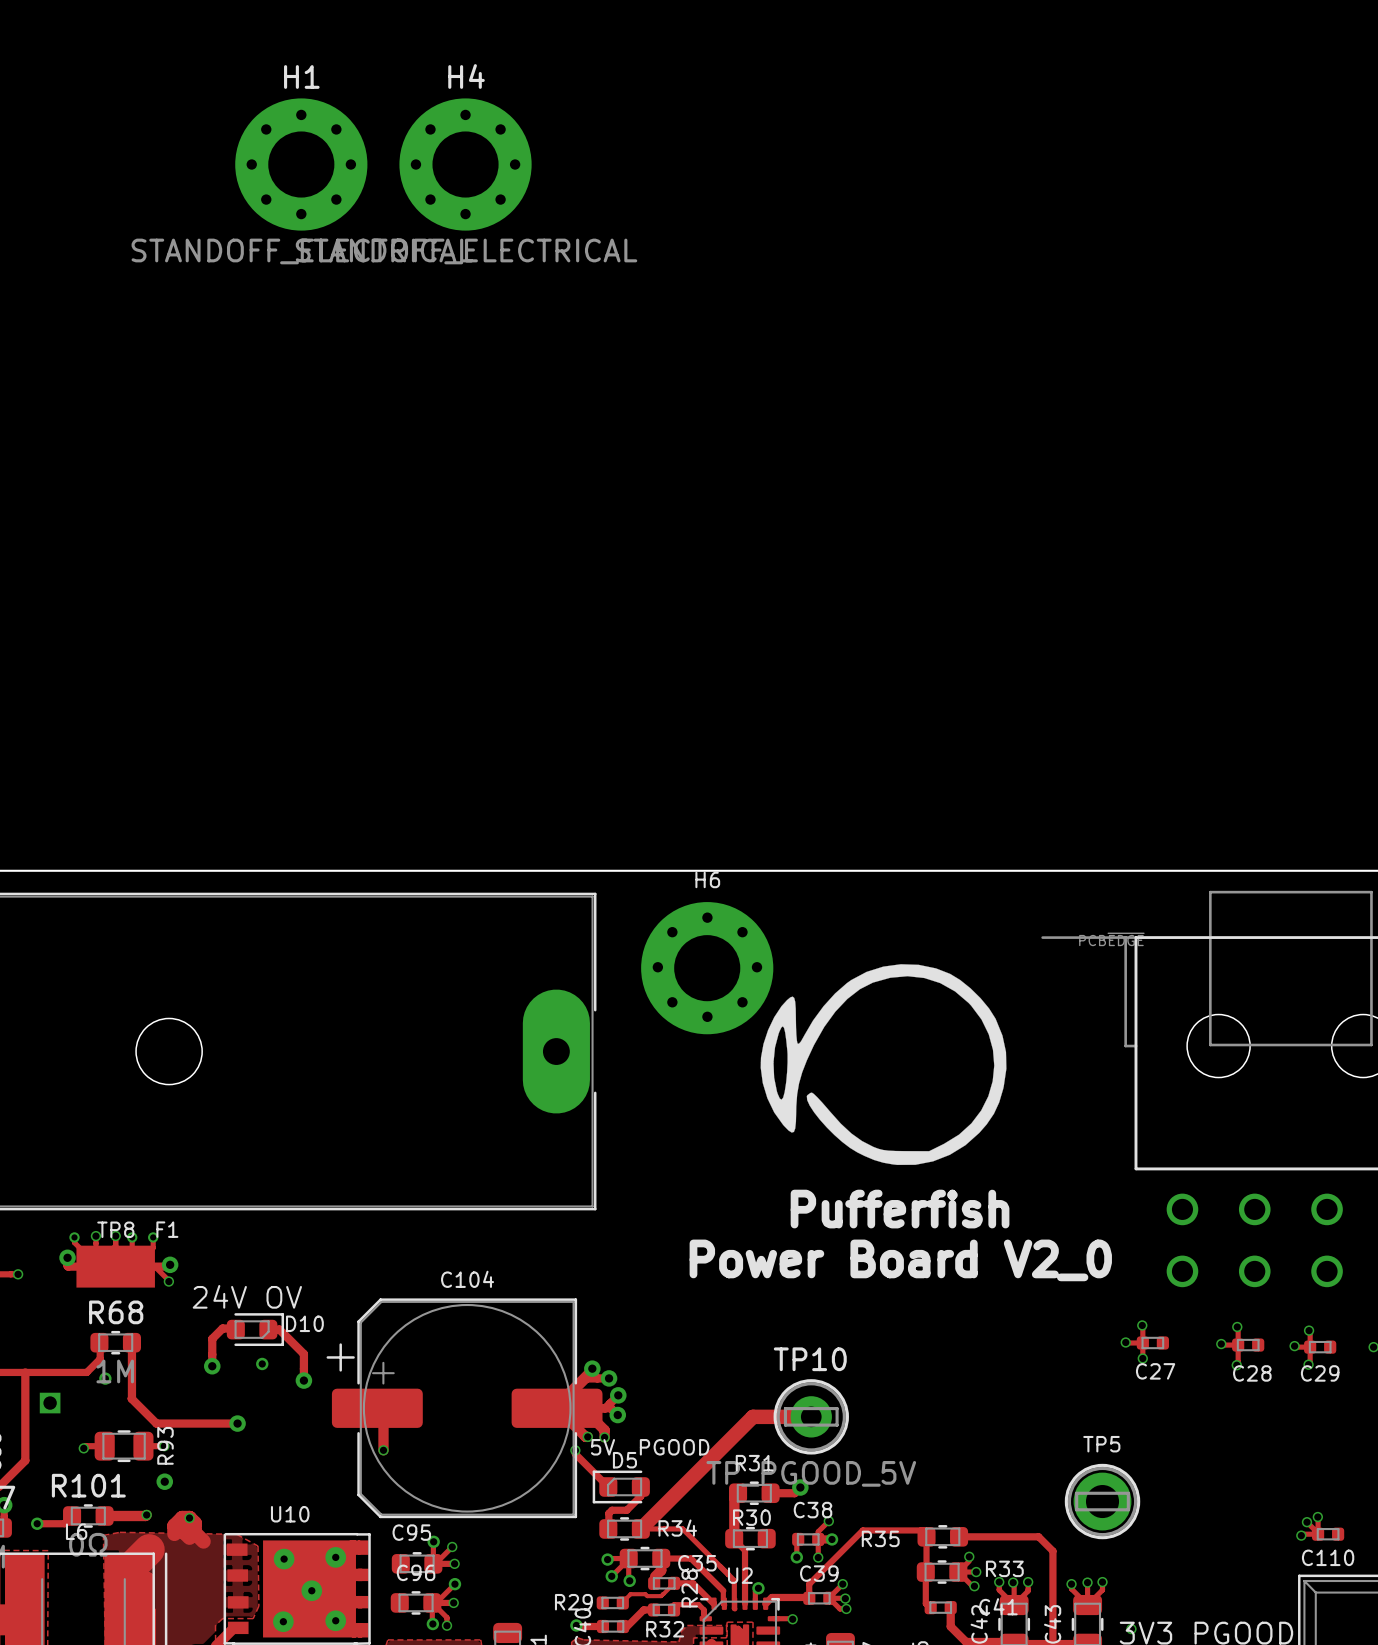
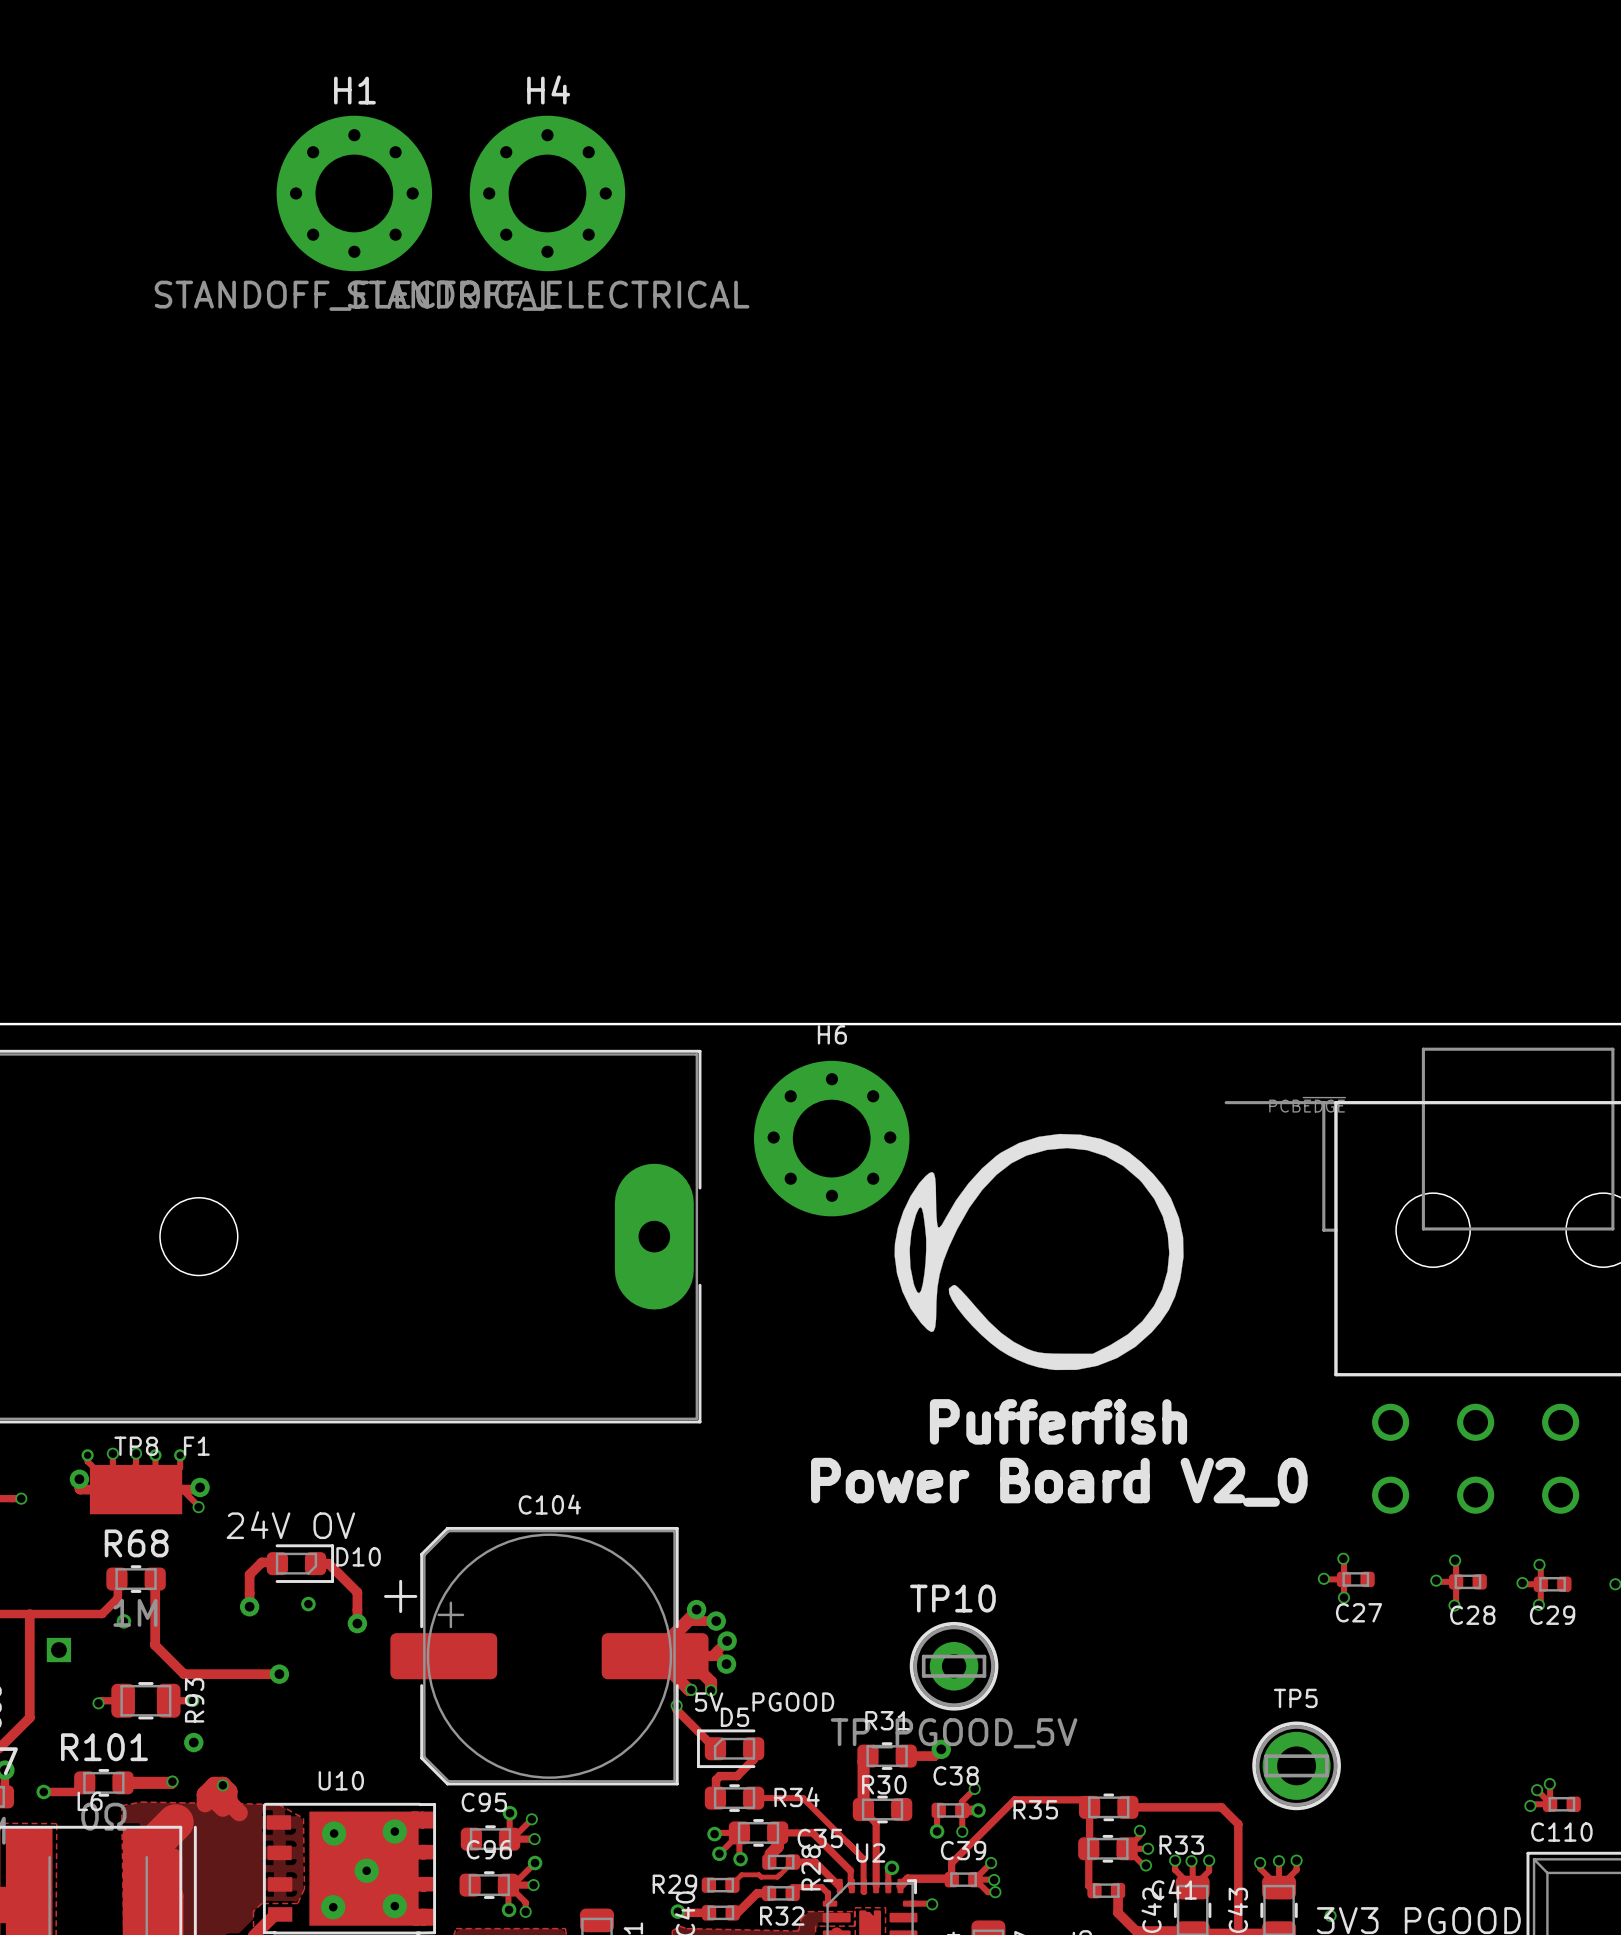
track: (381, 1412) (383, 1415) (383, 1450) -> none
track: (811, 1416) (752, 1416) (640, 1528) -> none
via: (383, 1450) -> none

